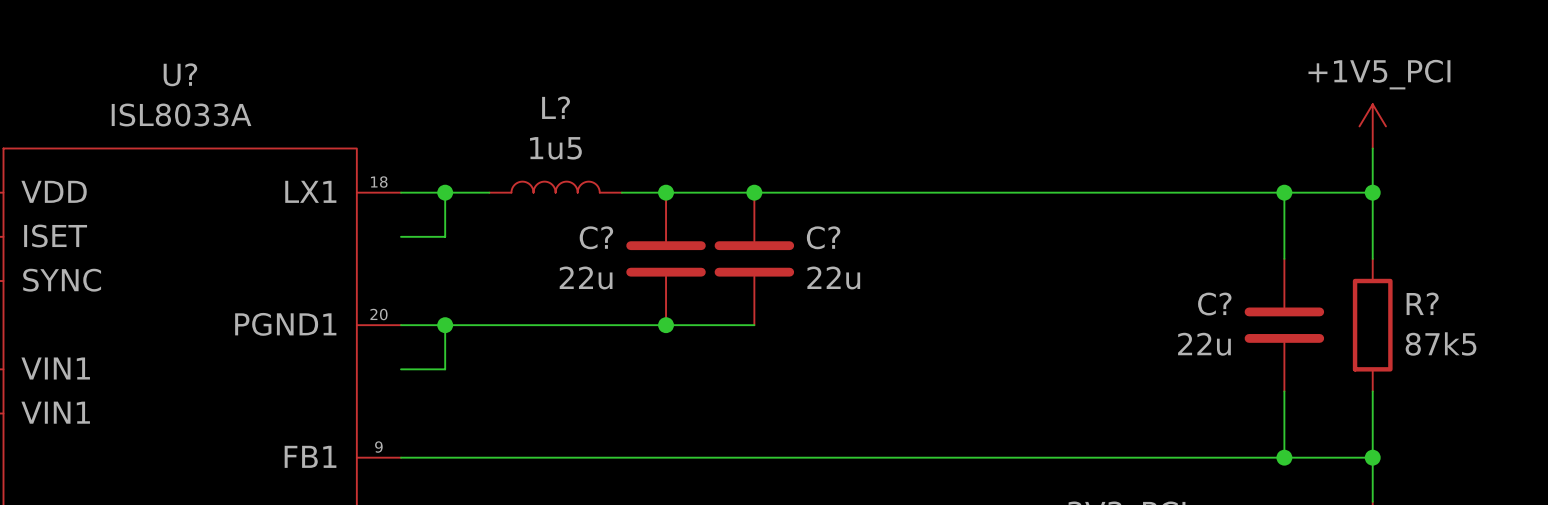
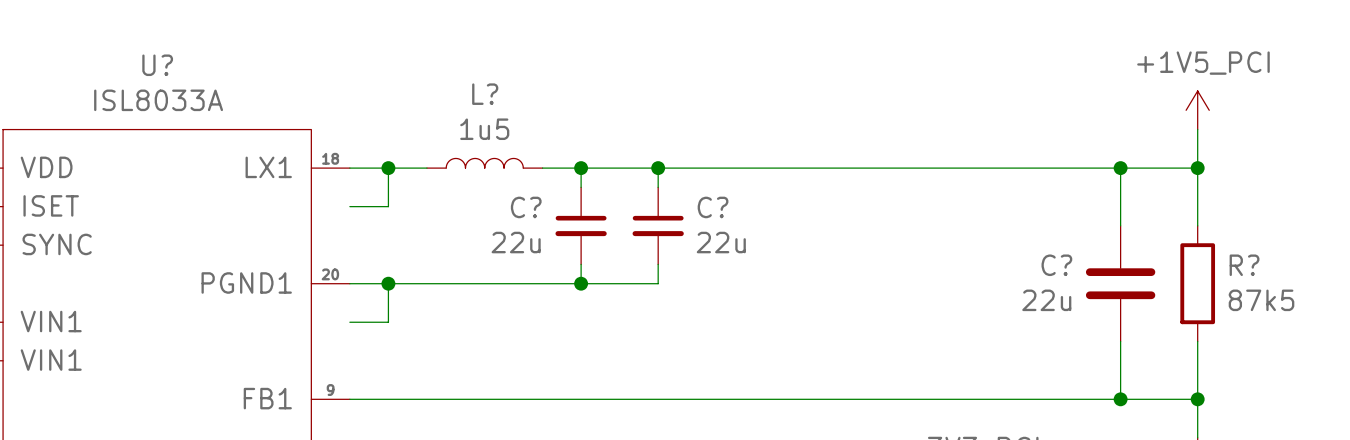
C? symbol: [626, 192, 706, 326] -> [555, 187, 607, 265]
C? symbol: [714, 192, 795, 326] -> [632, 187, 684, 265]

